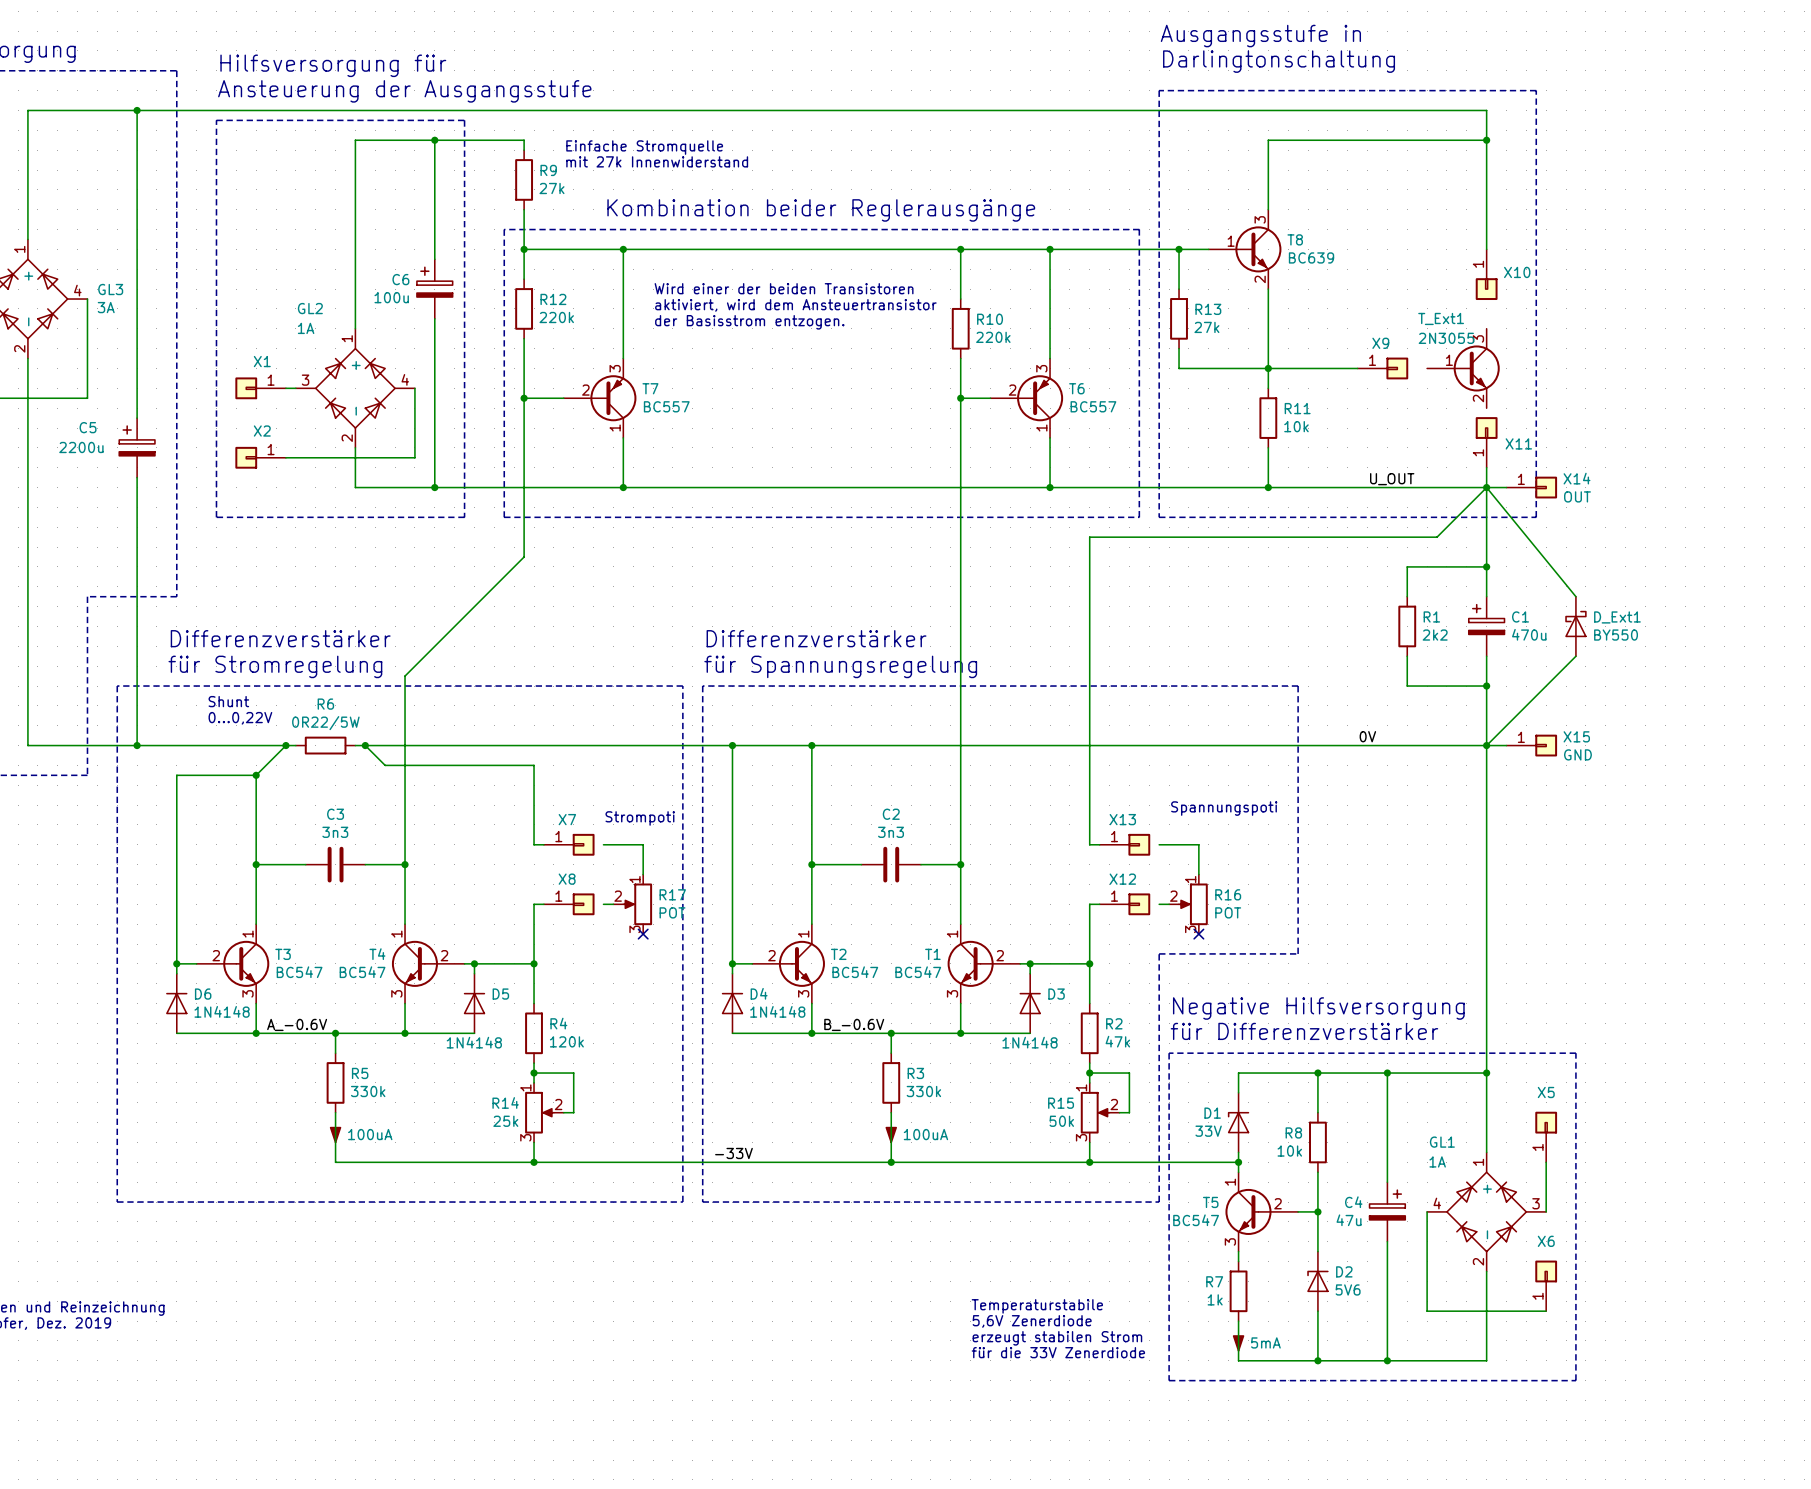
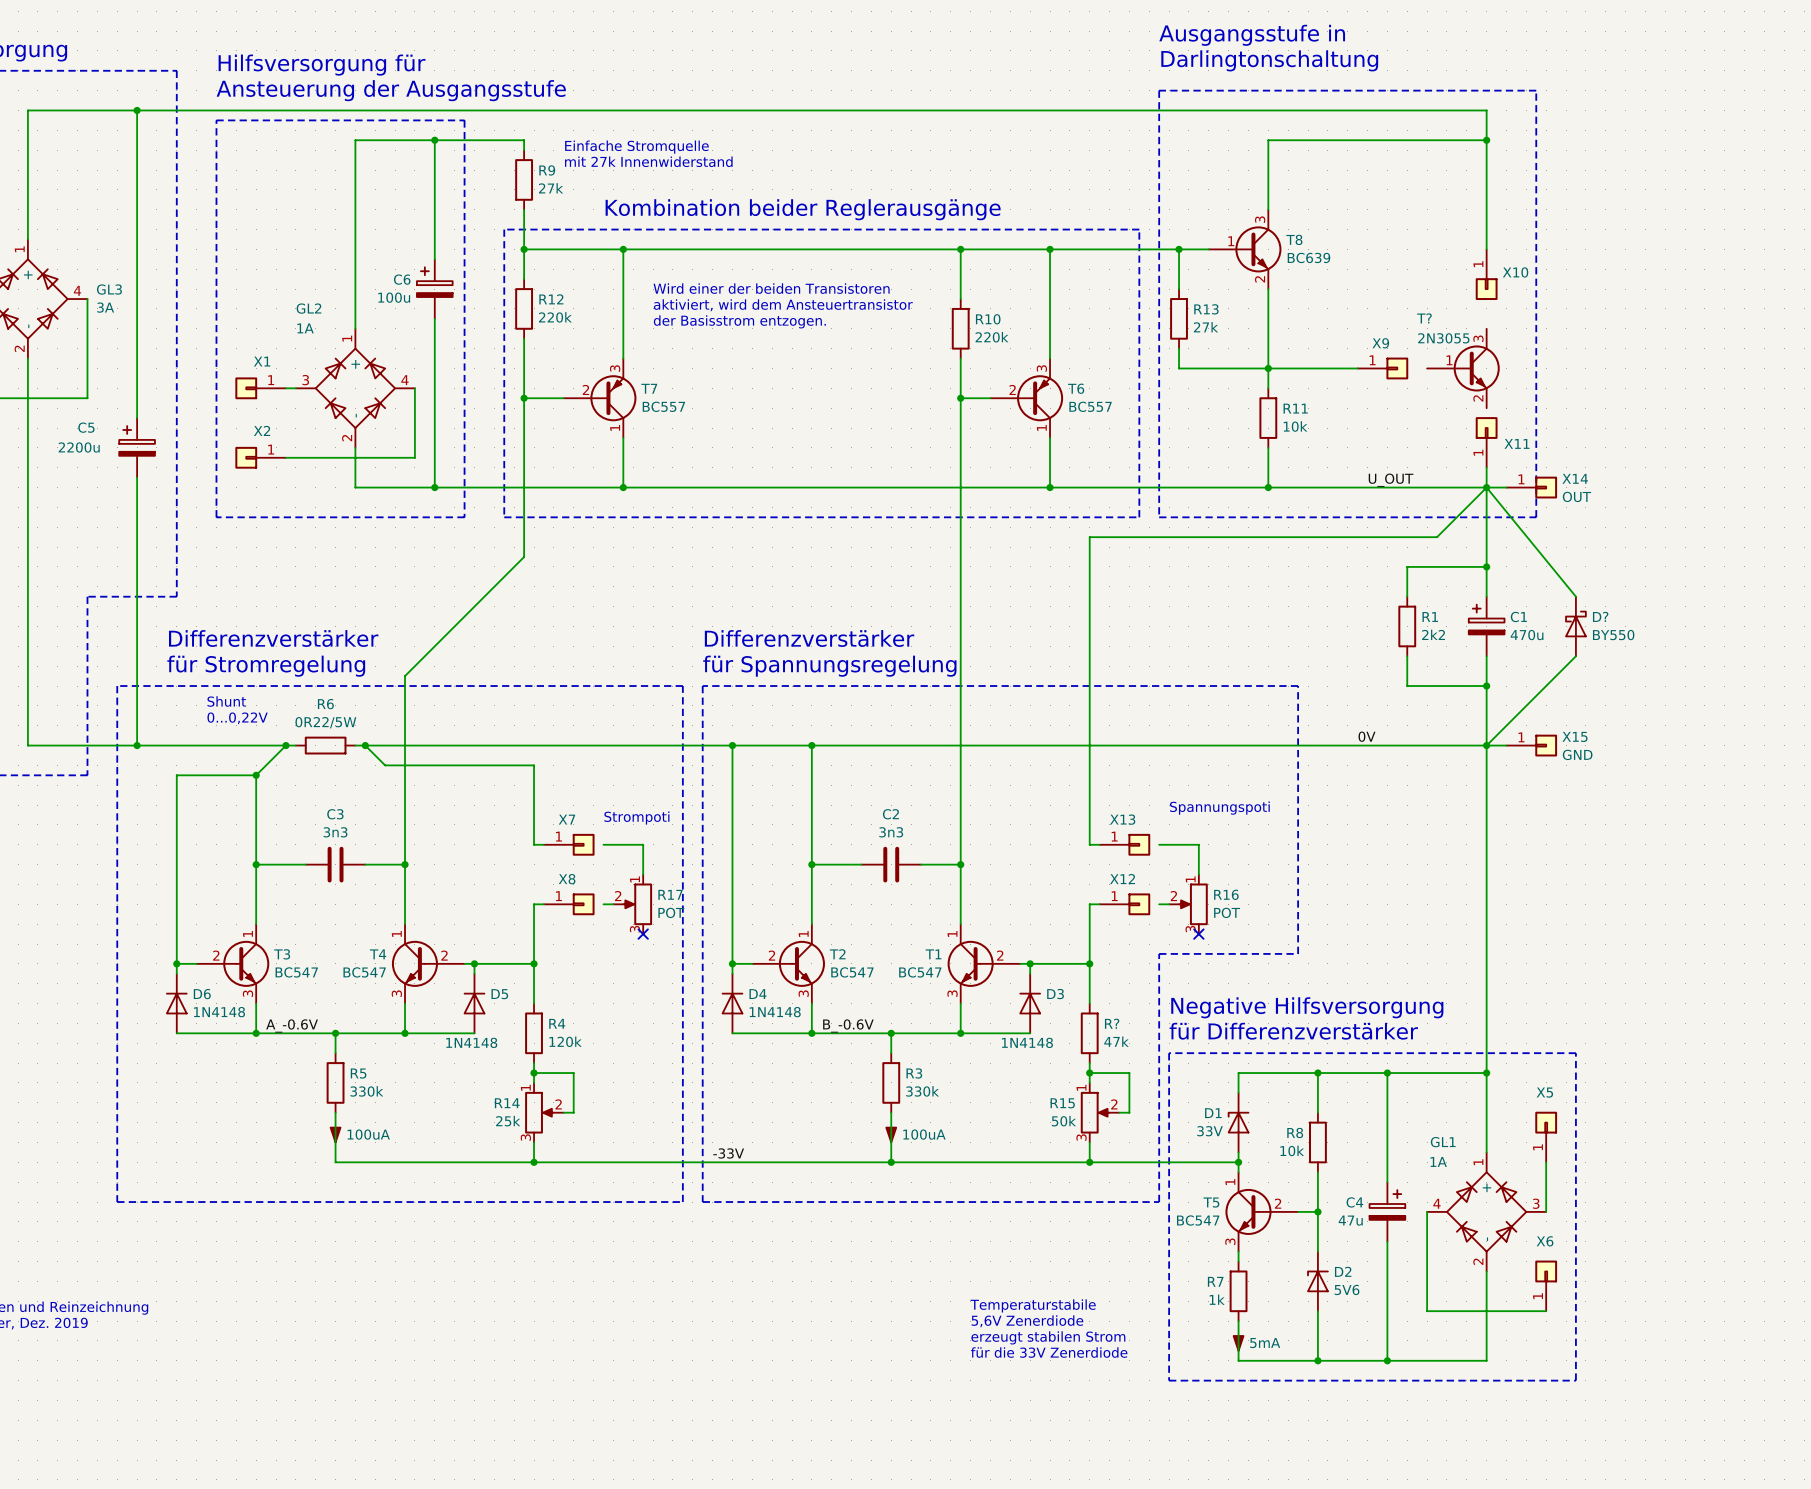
T_Ext1 name: T_Ext1 (1441, 318) -> T? (1424, 318)
D_Ext1 name: D_Ext1 (1617, 617) -> D? (1600, 616)
R2 name: R2 (1114, 1023) -> R? (1112, 1023)

